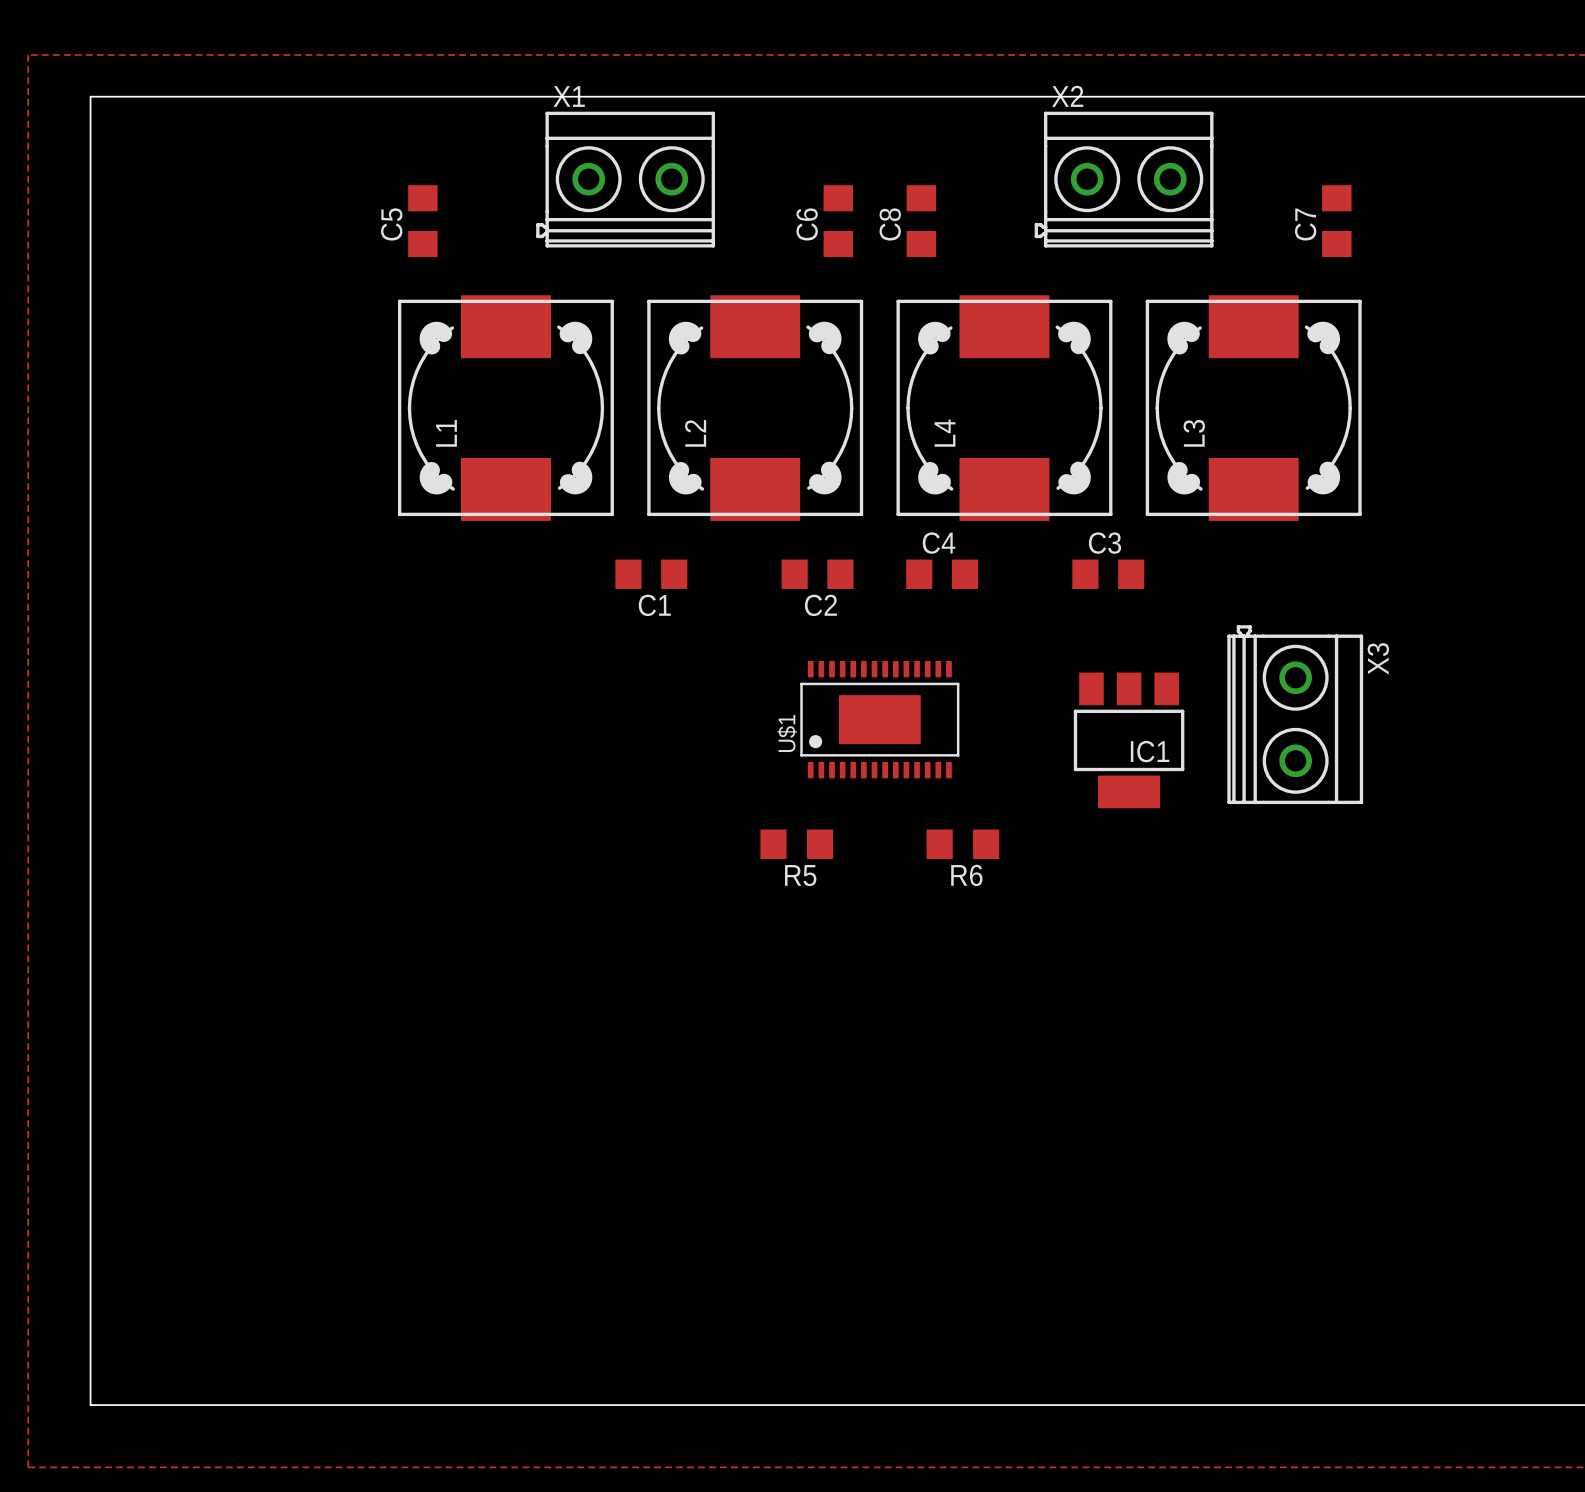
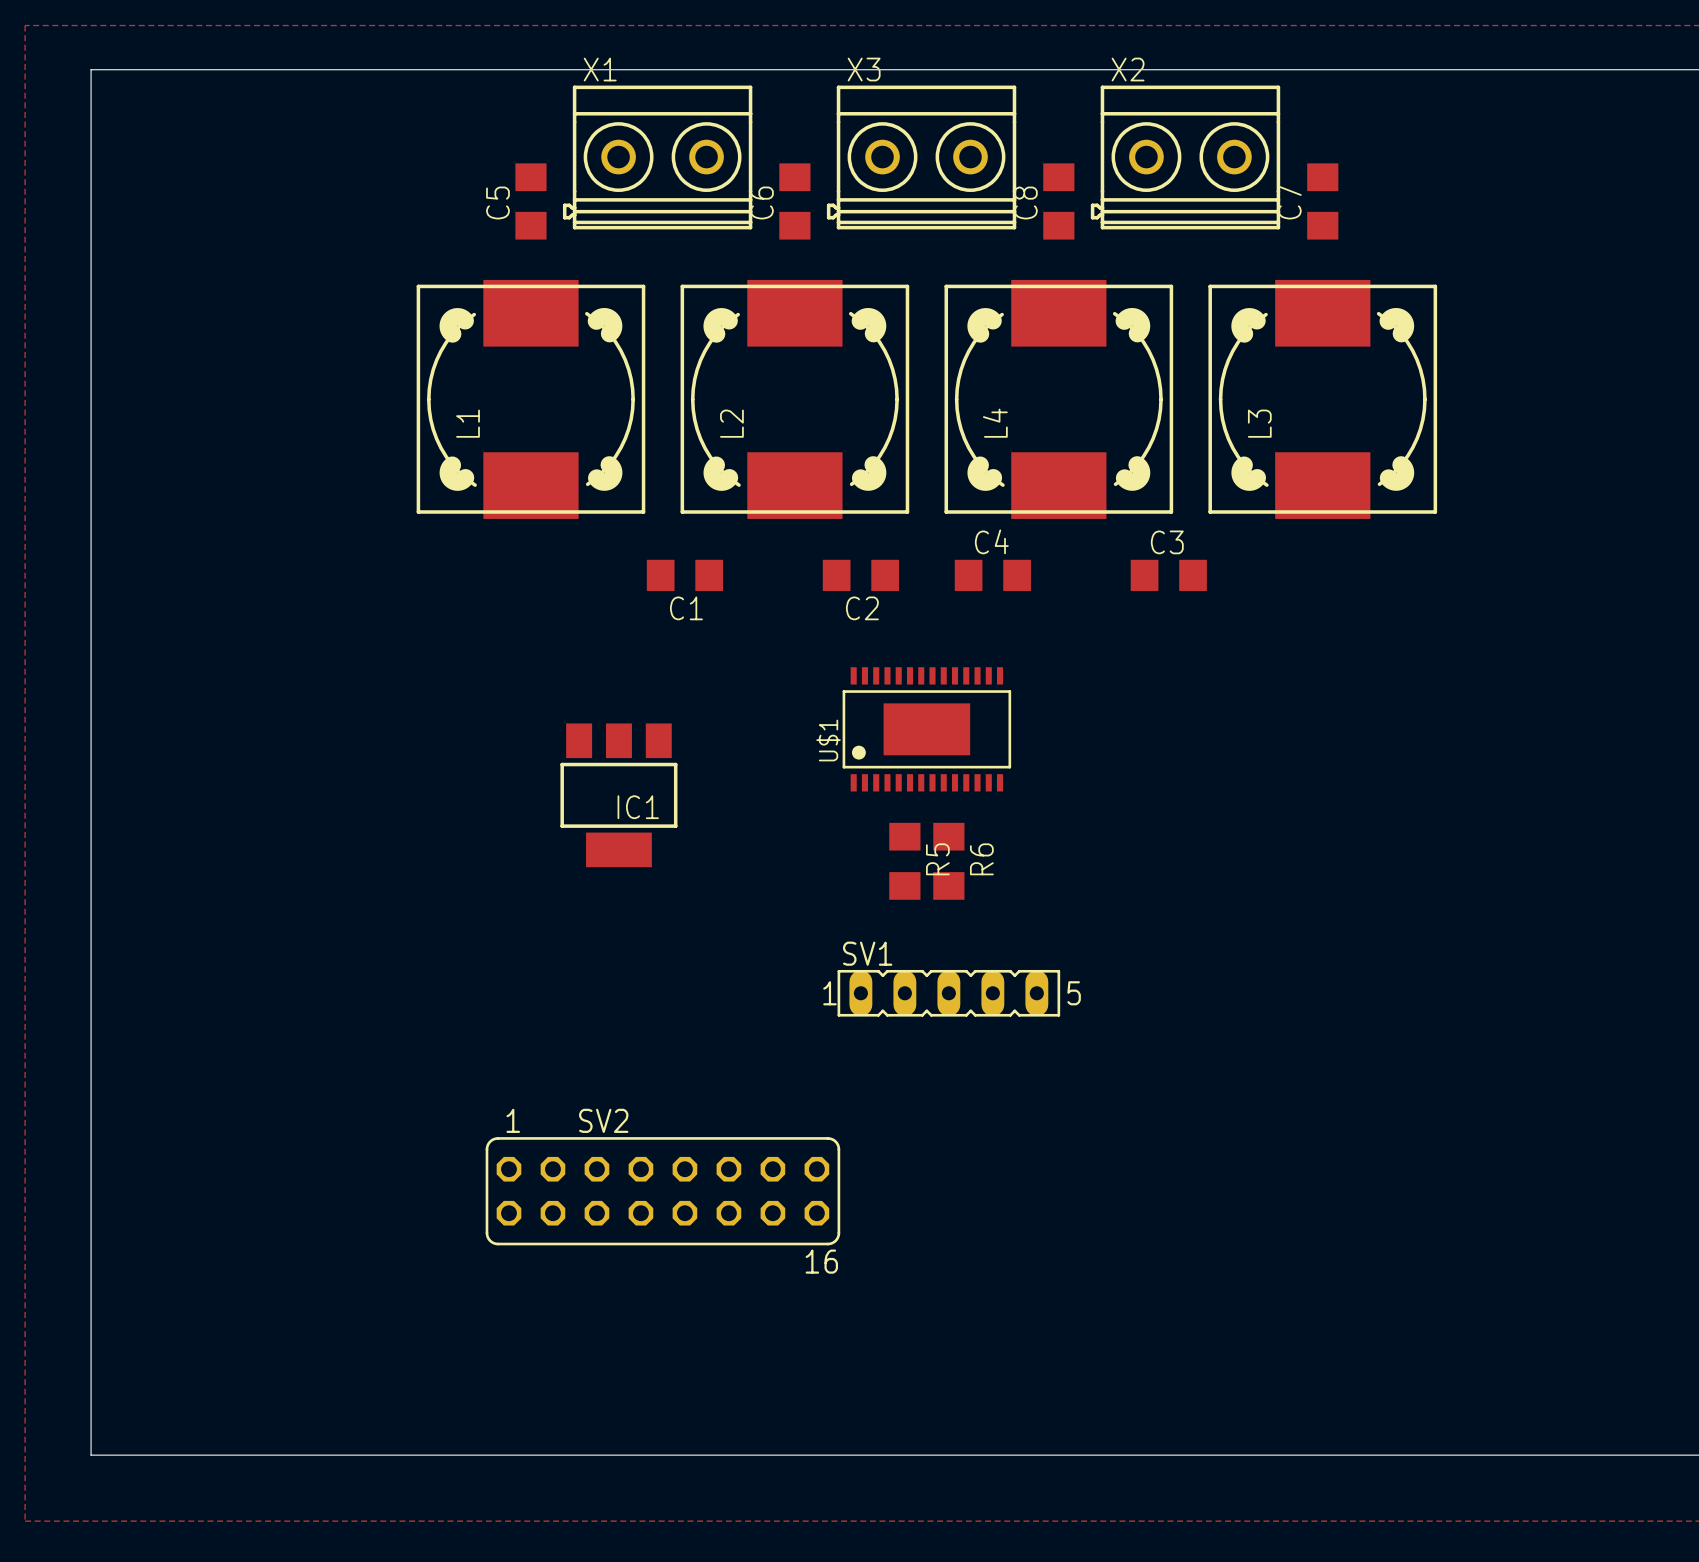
C5 position: (422, 221) -> (530, 201)
C6 position: (838, 221) -> (794, 201)
C8 position: (921, 221) -> (1058, 201)
C7 position: (1336, 221) -> (1322, 201)
X3 rotation: 0° (1295, 714) -> 90° counterclockwise (921, 157)
X3 position: (1295, 714) -> (921, 157)
IC1 position: (1129, 740) -> (618, 795)
R5 rotation: 0° (796, 844) -> 90° clockwise (904, 861)
R5 position: (796, 844) -> (904, 861)
R6 rotation: 0° (962, 844) -> 90° clockwise (948, 861)
R6 position: (962, 844) -> (948, 861)
R5 name position: R5 (800, 875) -> R5 (937, 859)
R6 name position: R6 (966, 875) -> R6 (981, 859)
SV1: none -> (948, 993)
SV2: none -> (662, 1191)

